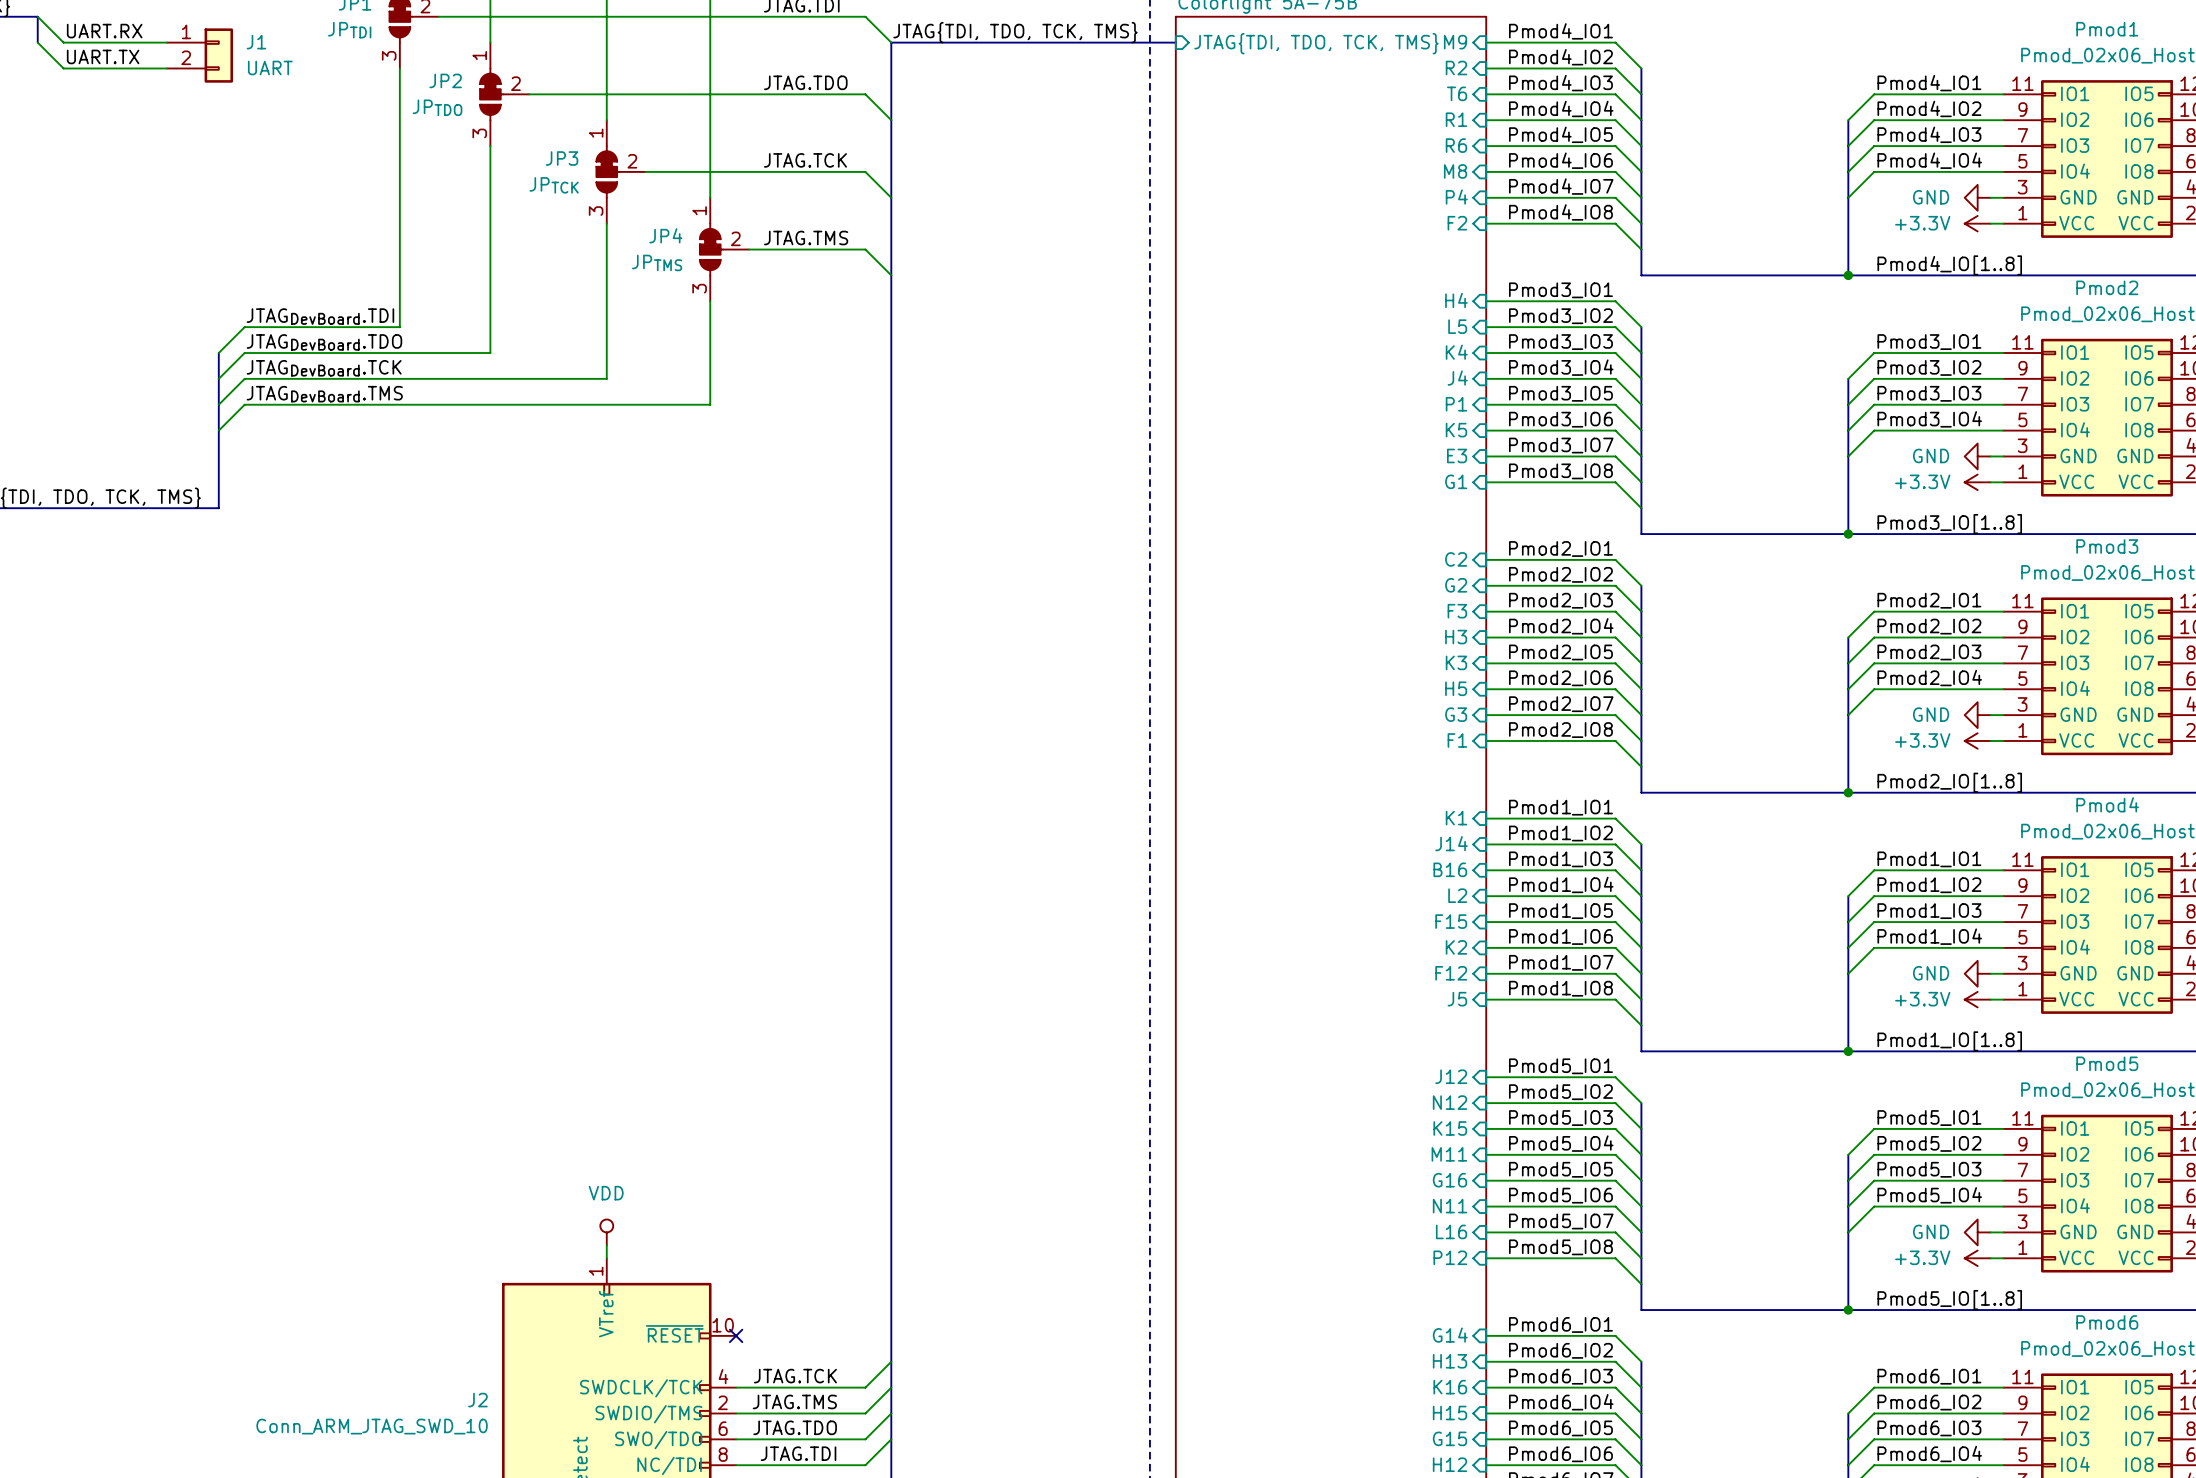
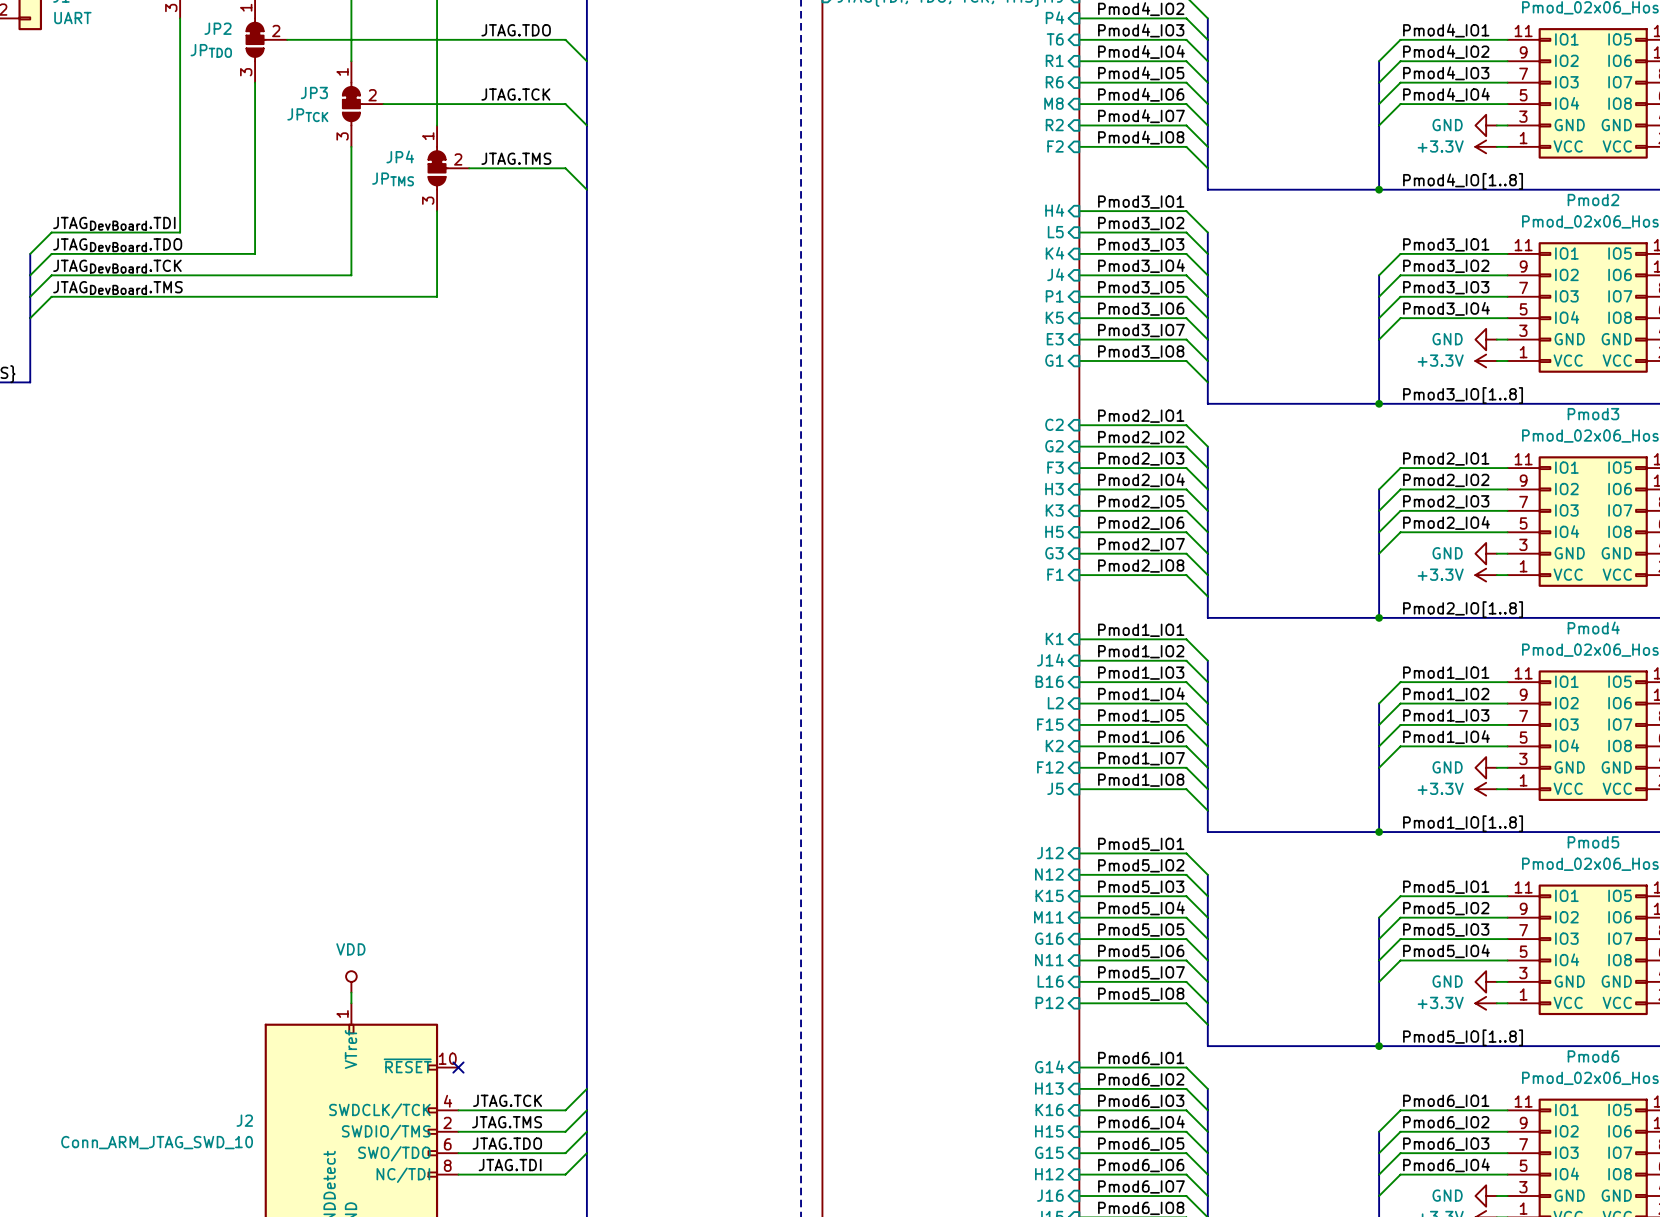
sheet pin: R2 (1456, 68) -> P4 (1054, 17)
sheet pin: P4 (1456, 197) -> R2 (1054, 125)

